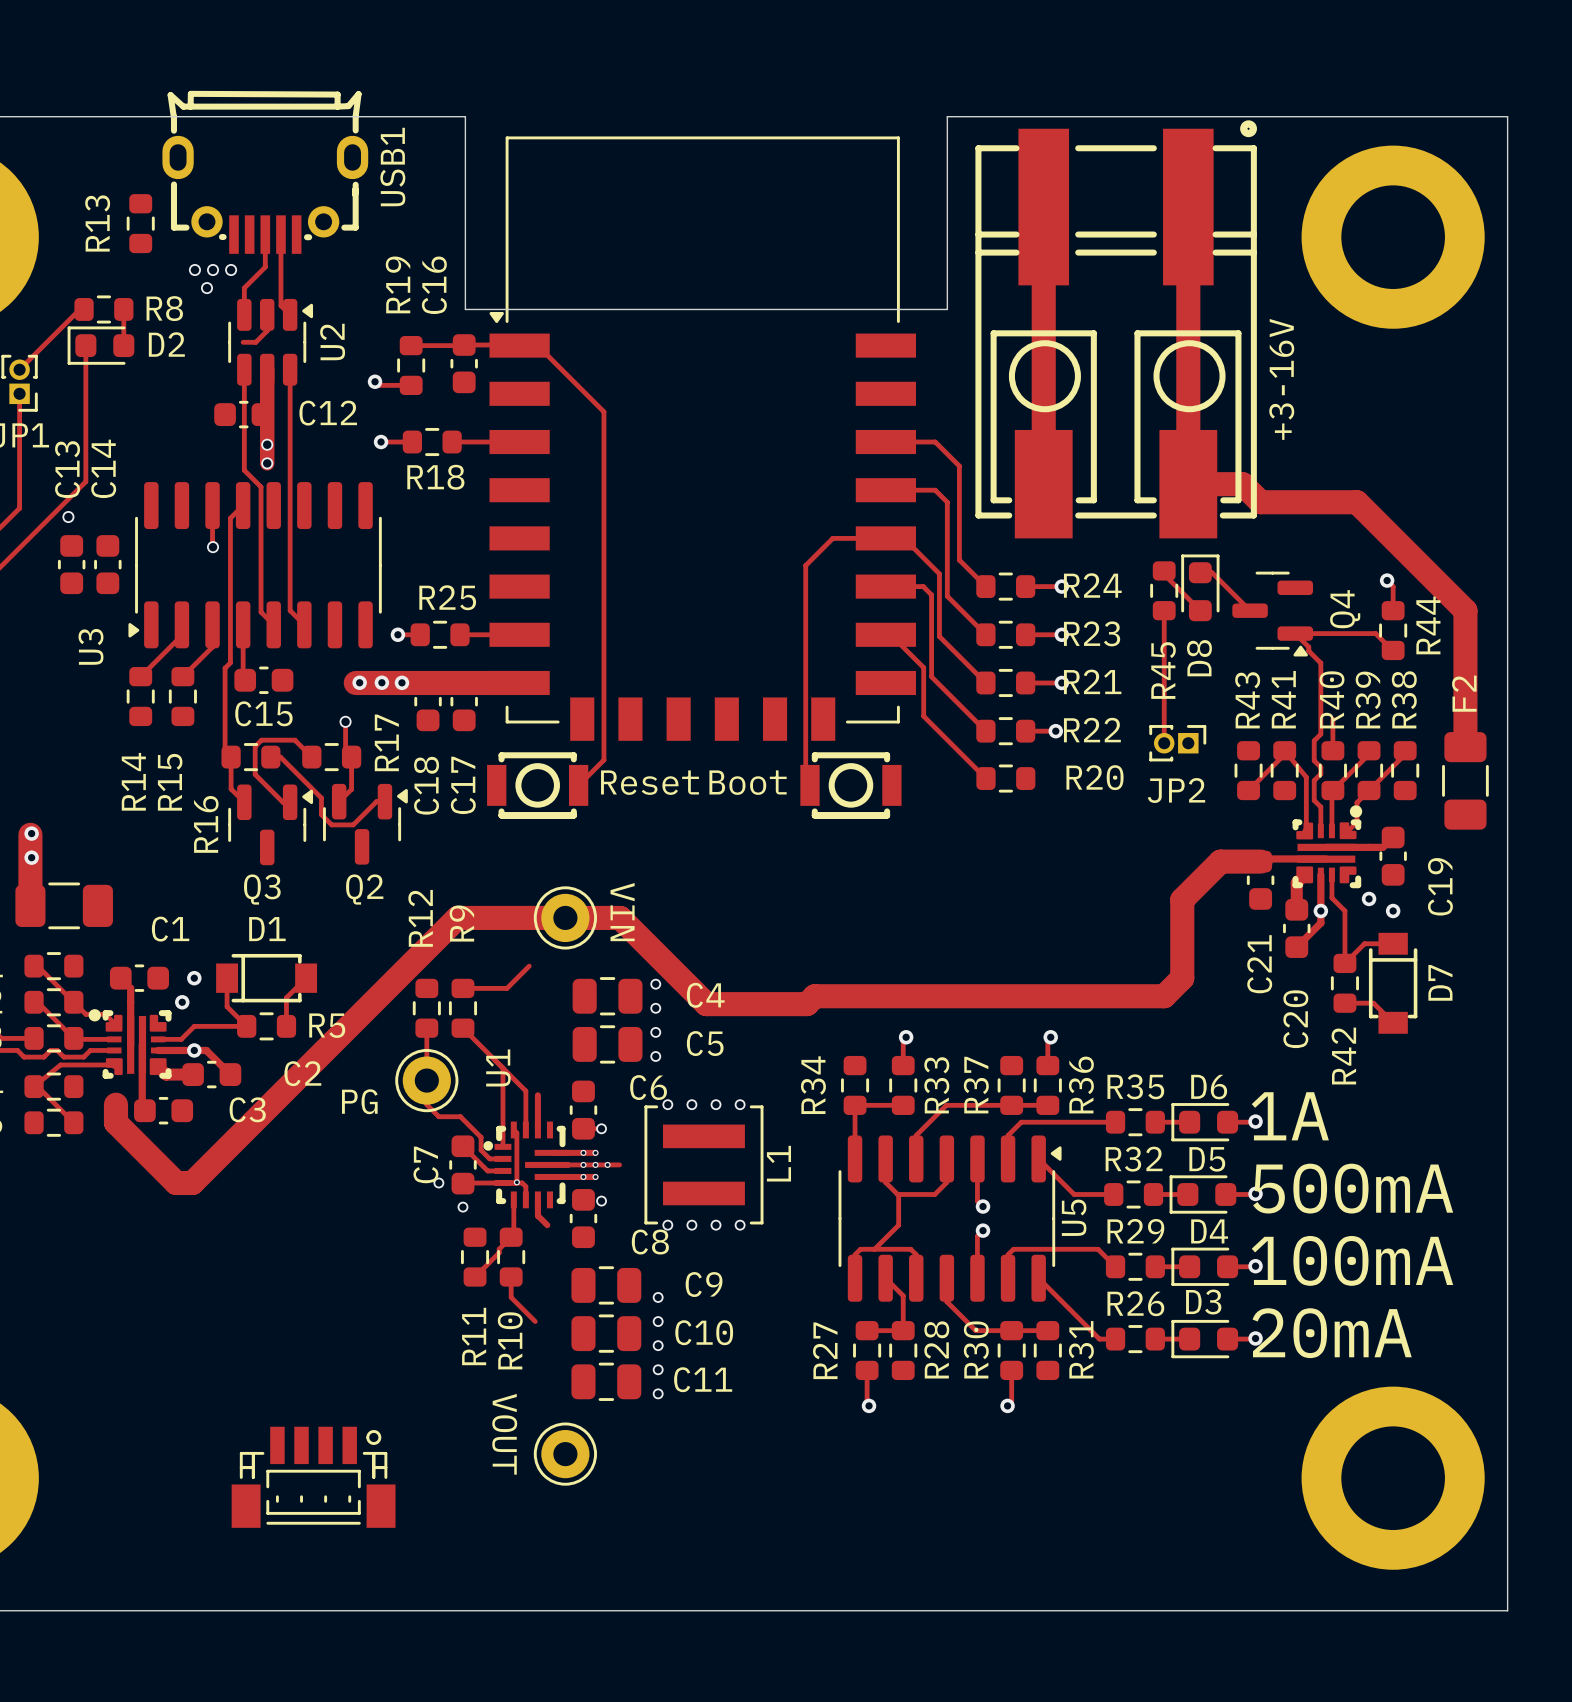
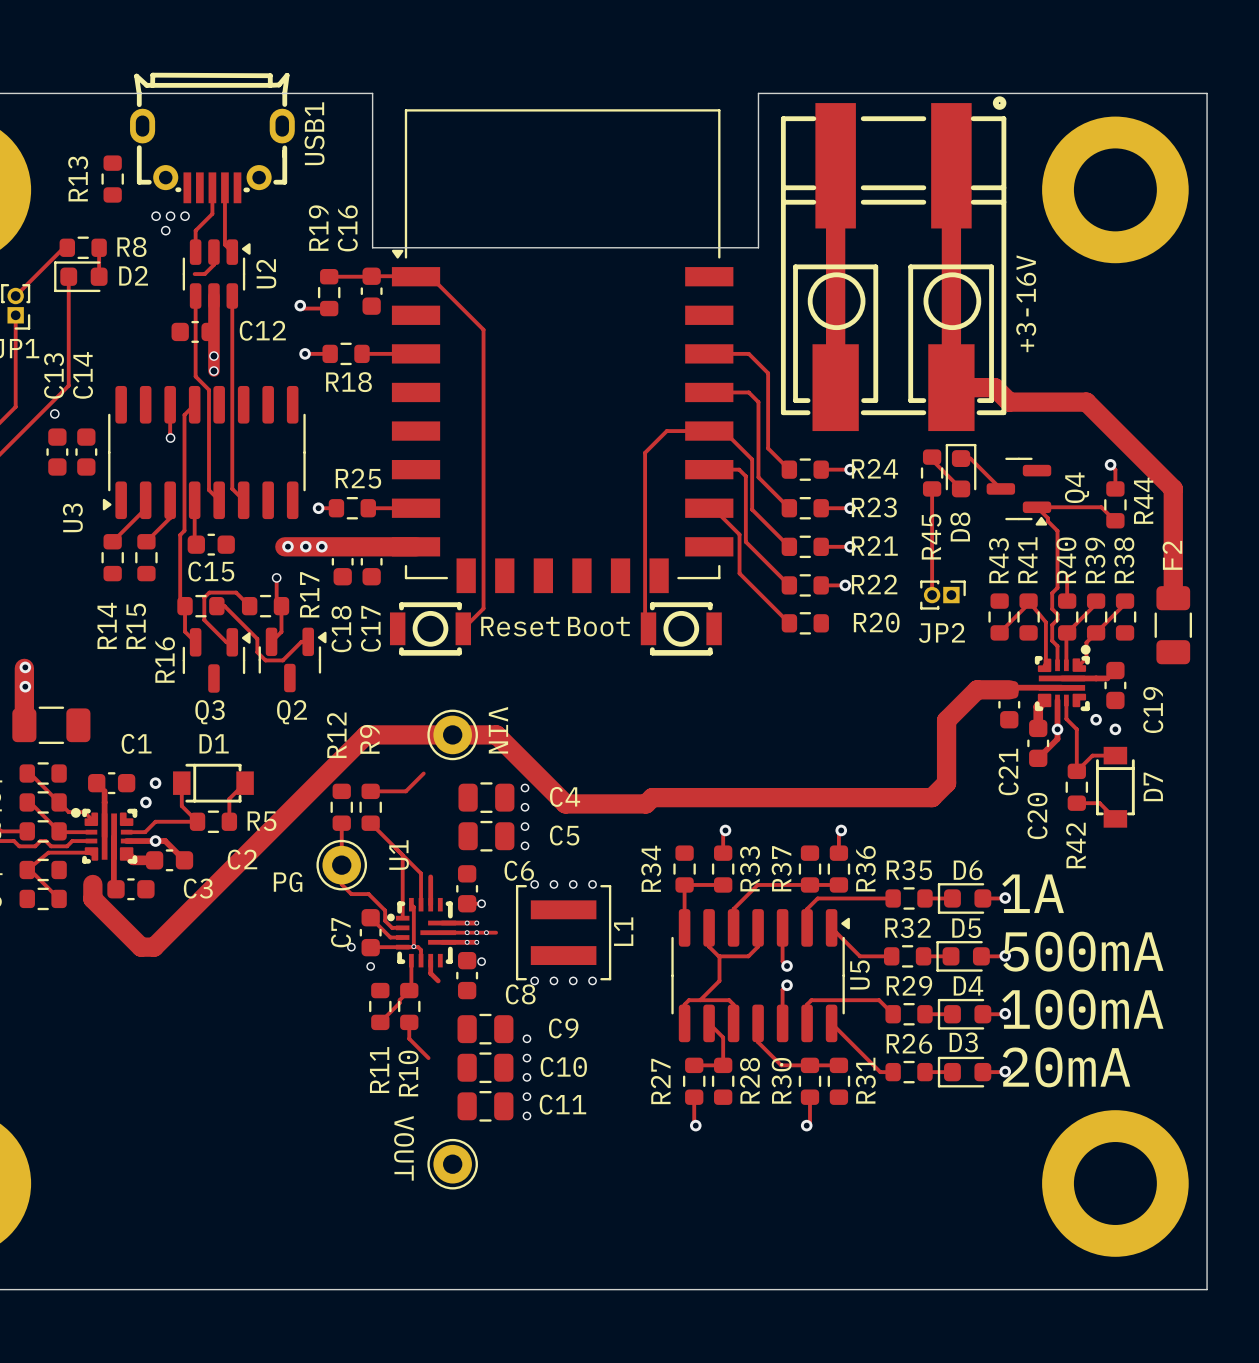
part: (313, 1477) -> none

